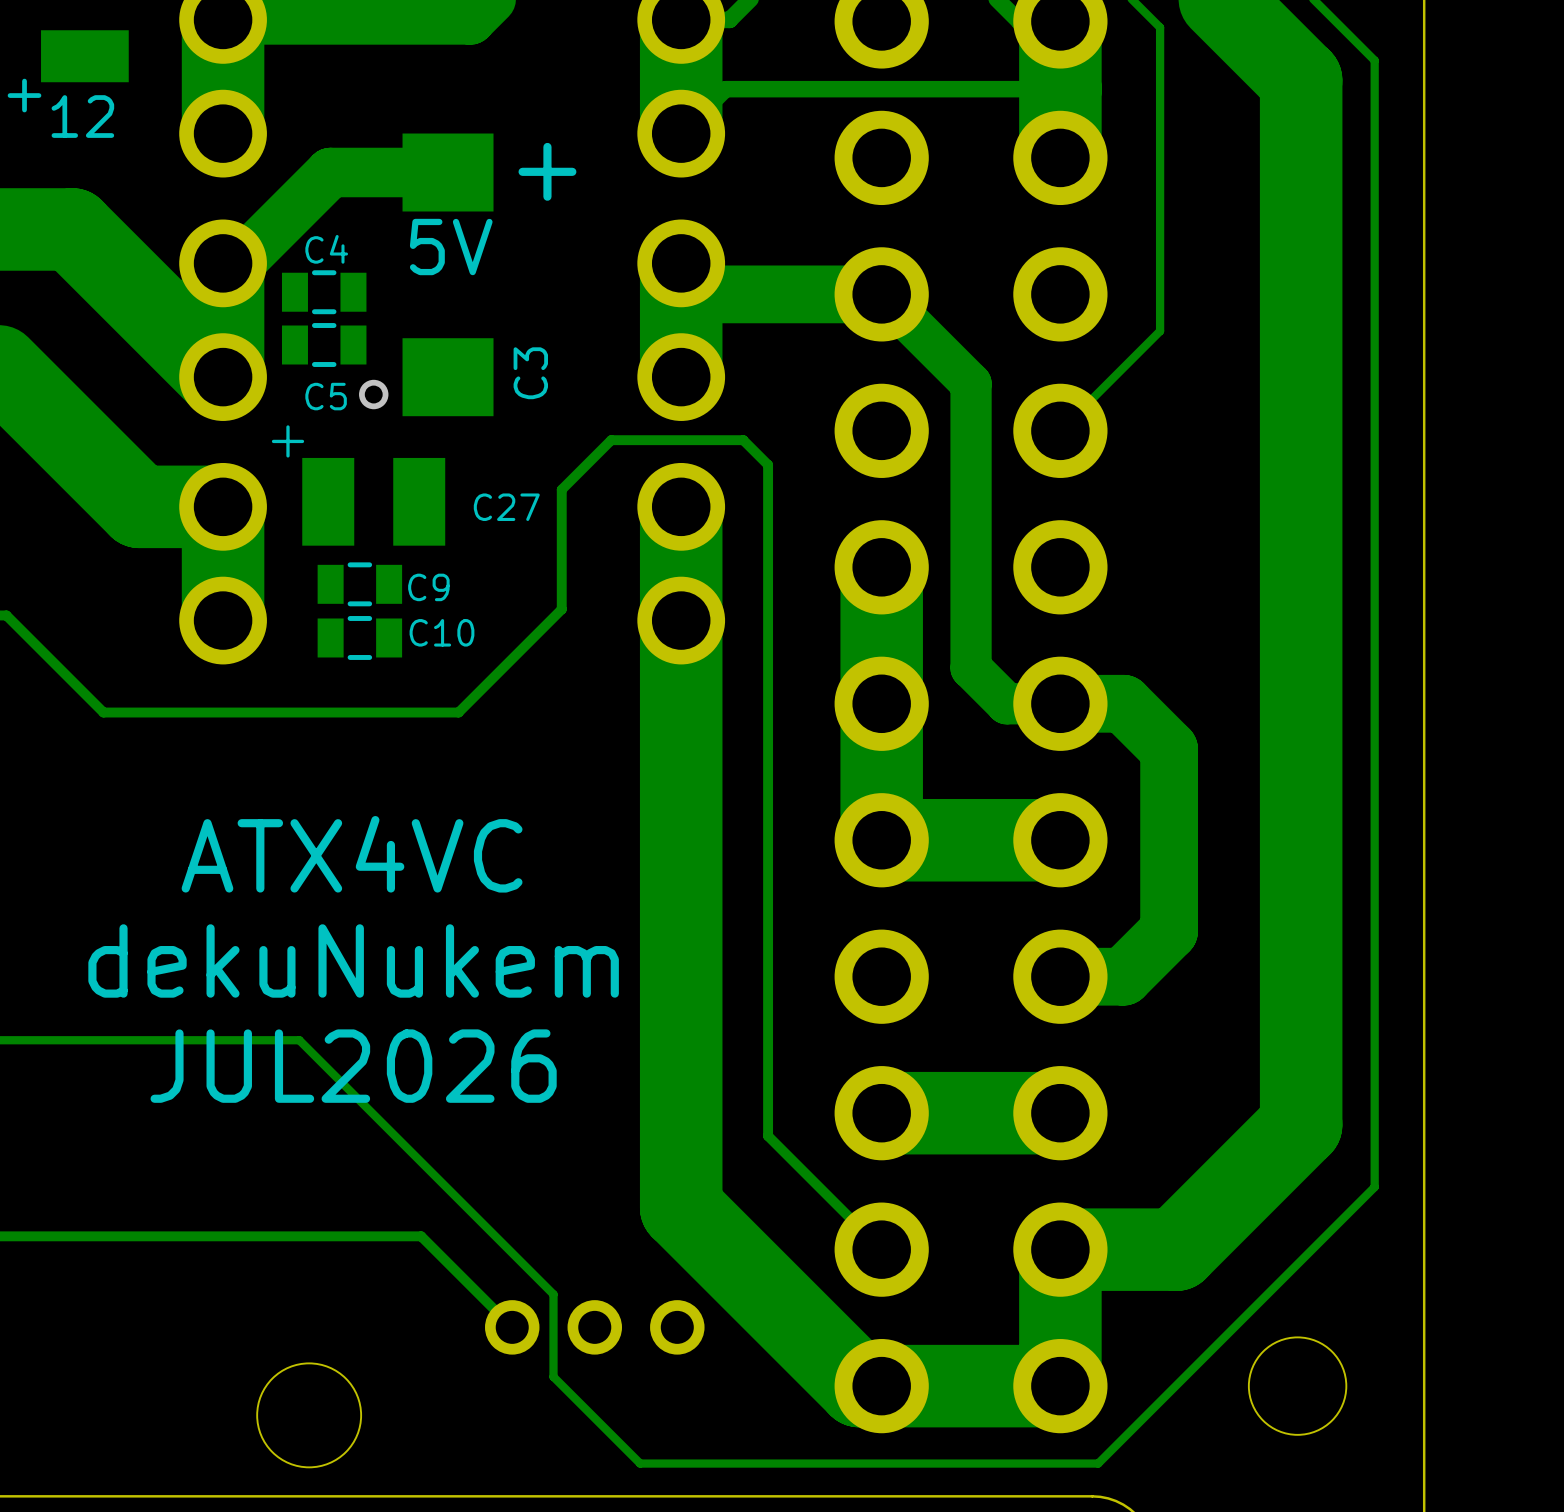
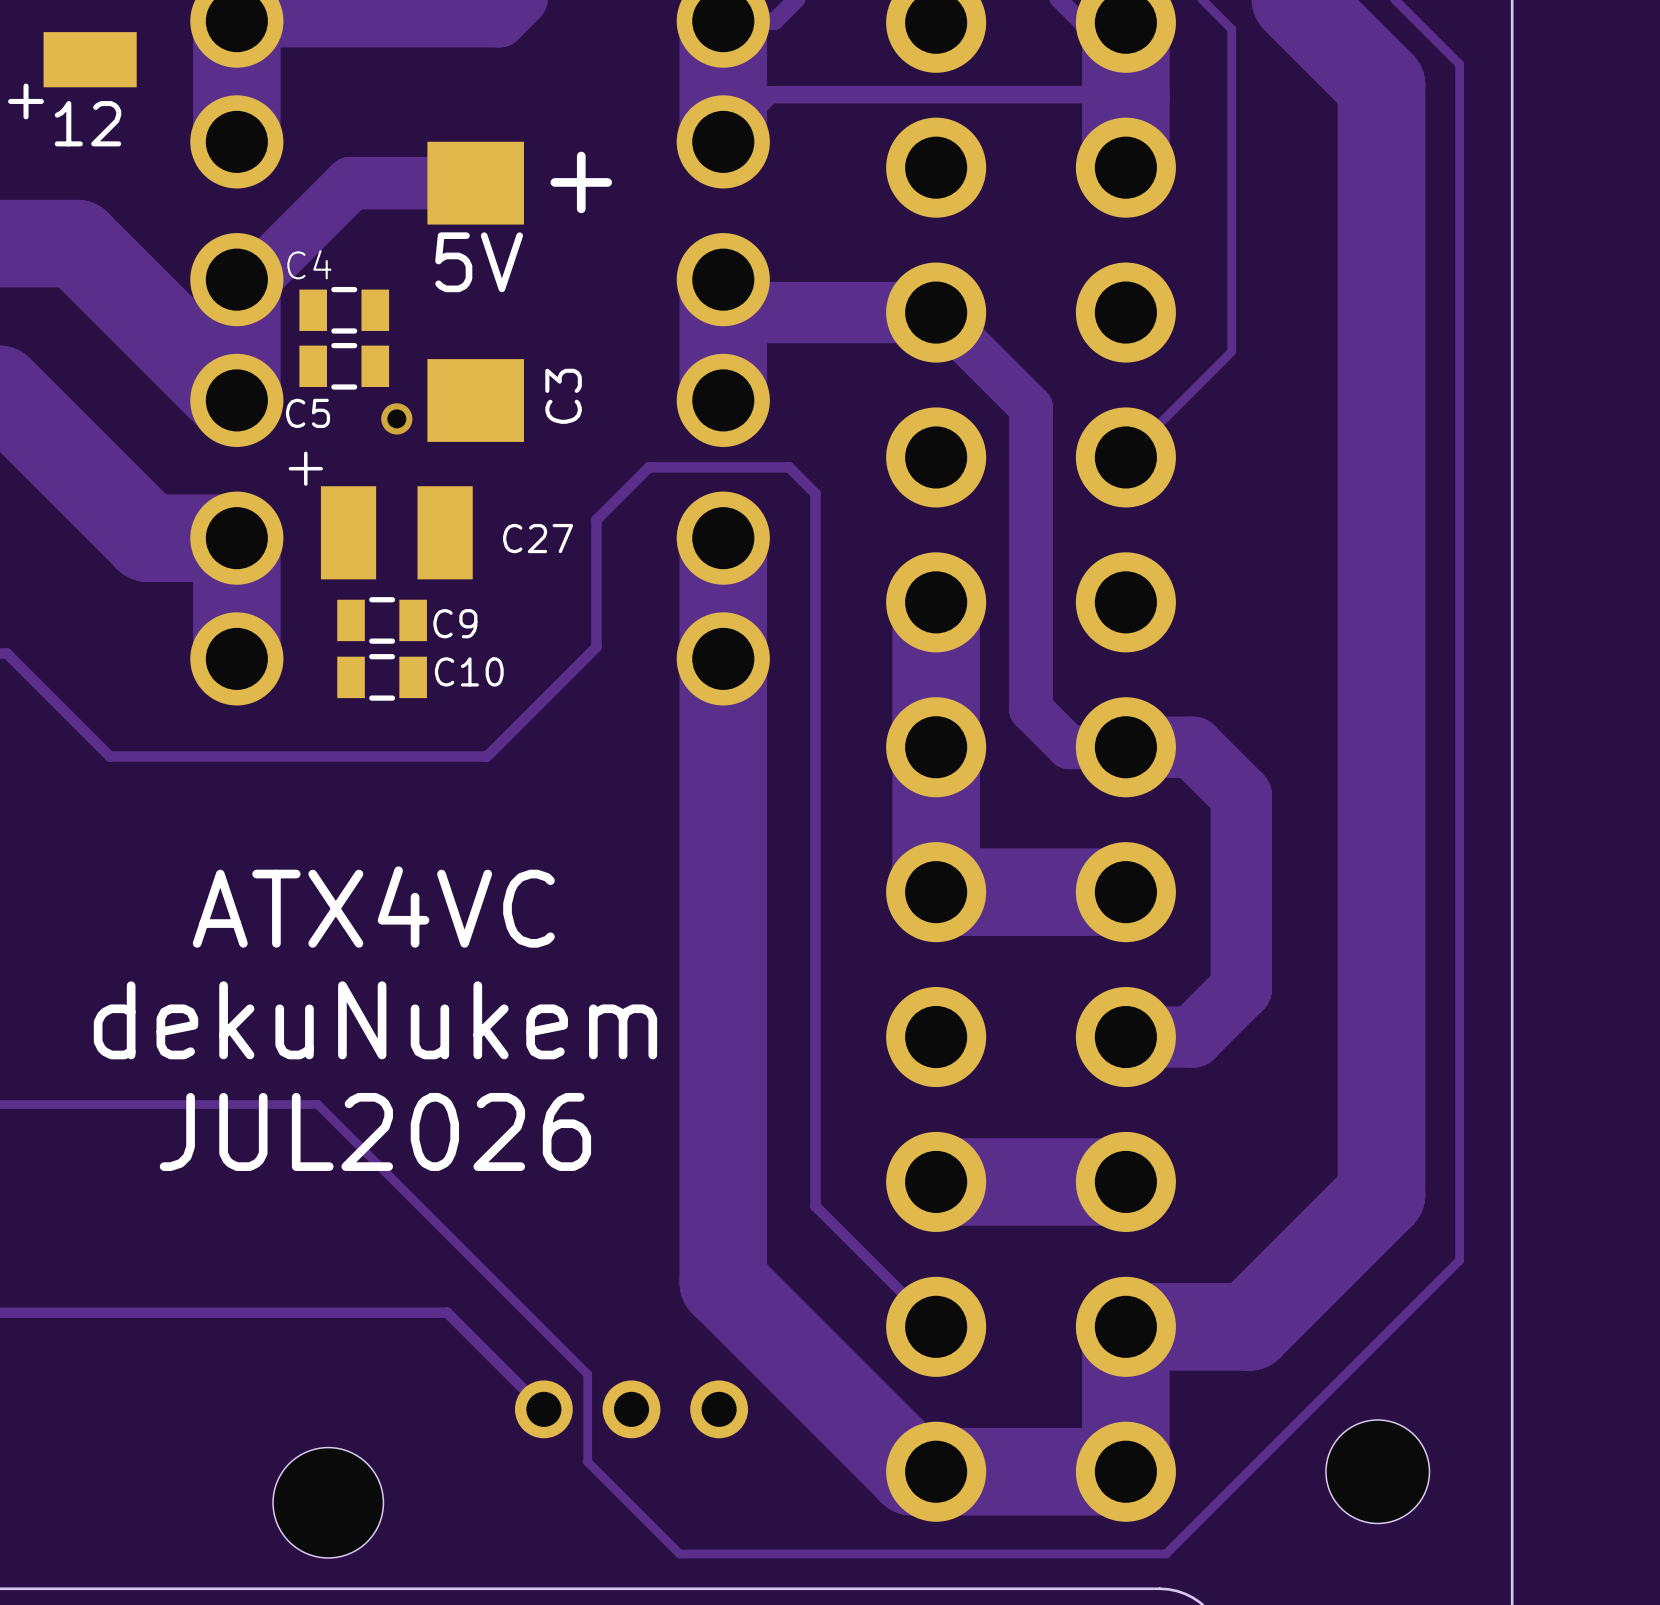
C4 name position: C4 (326, 249) -> C4 (309, 264)
C5 name position: C5 (326, 396) -> C5 (307, 413)

